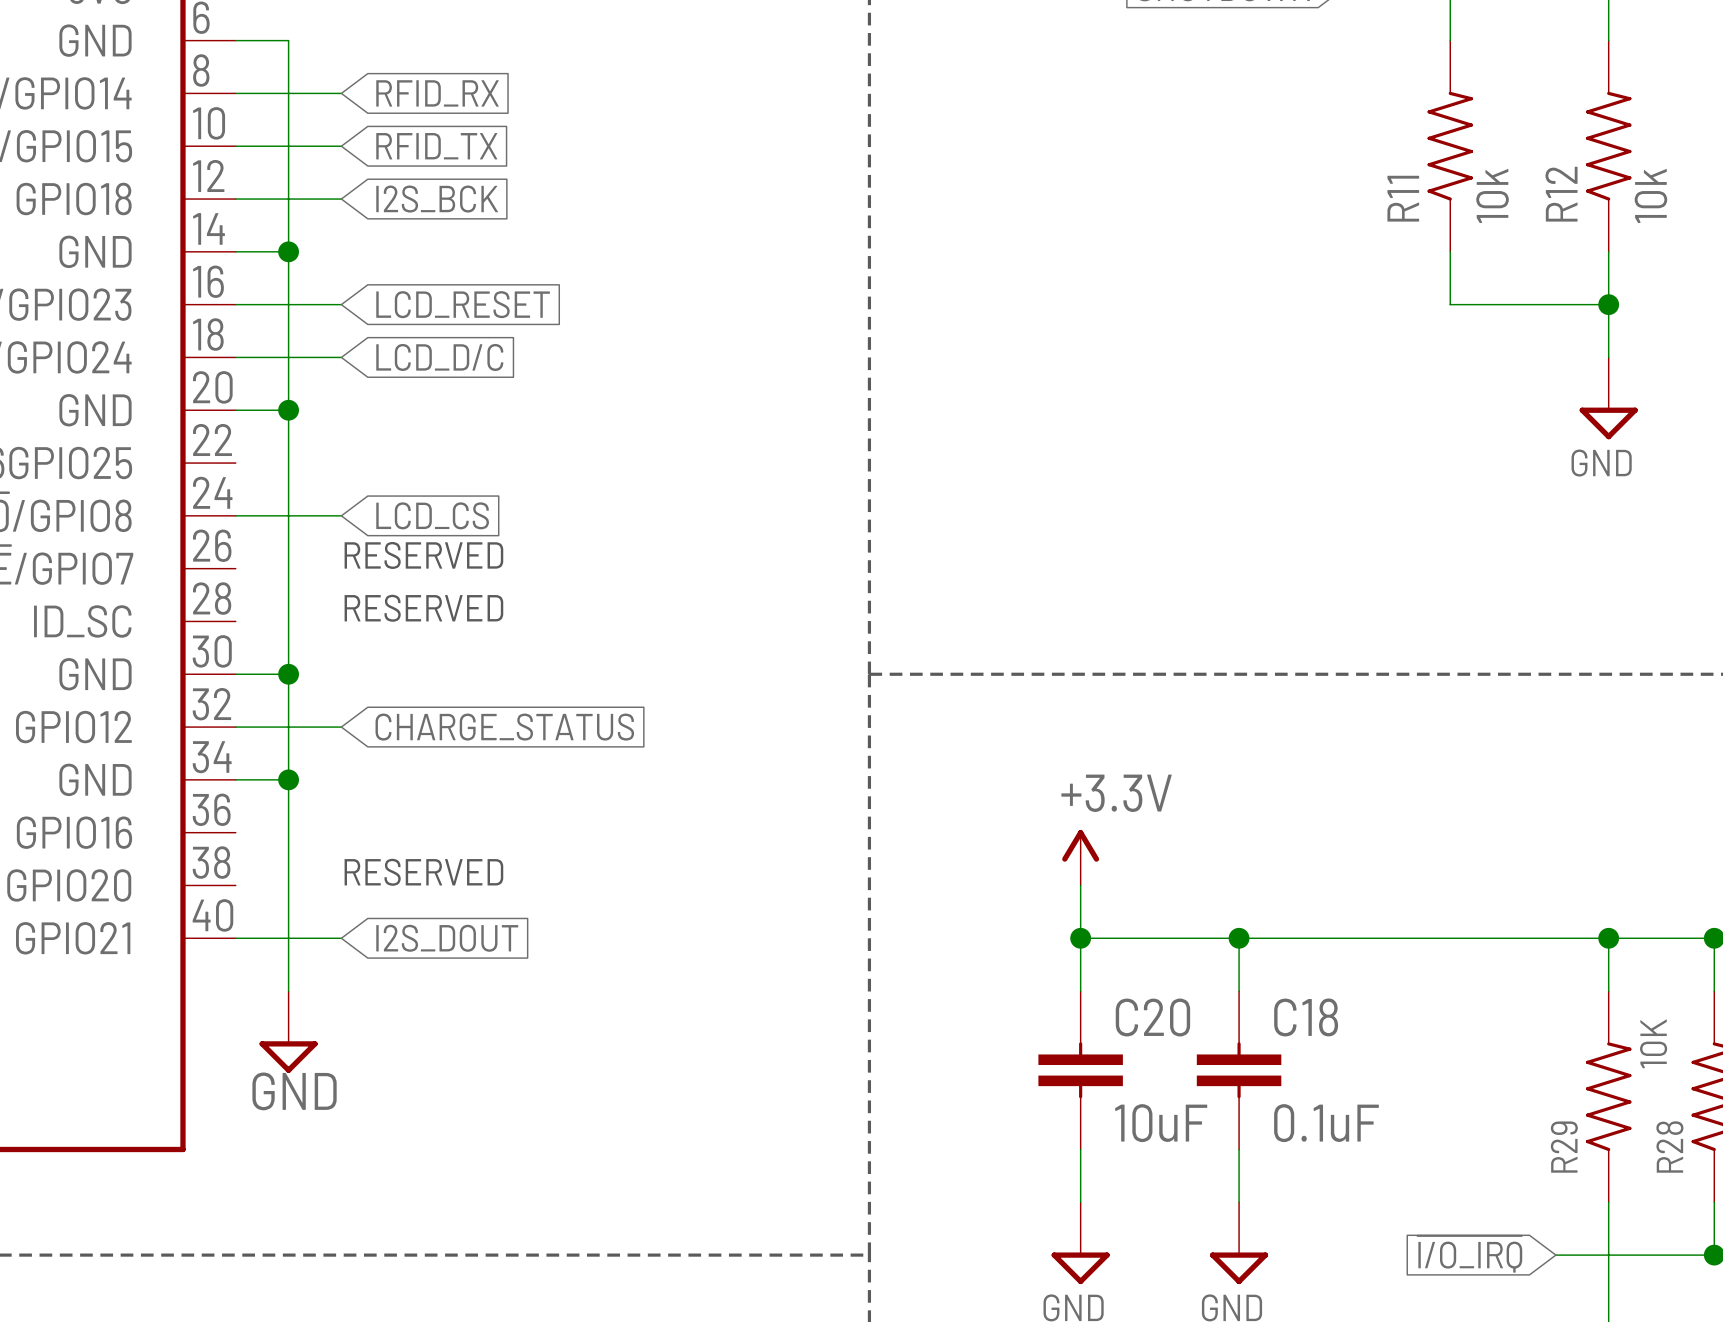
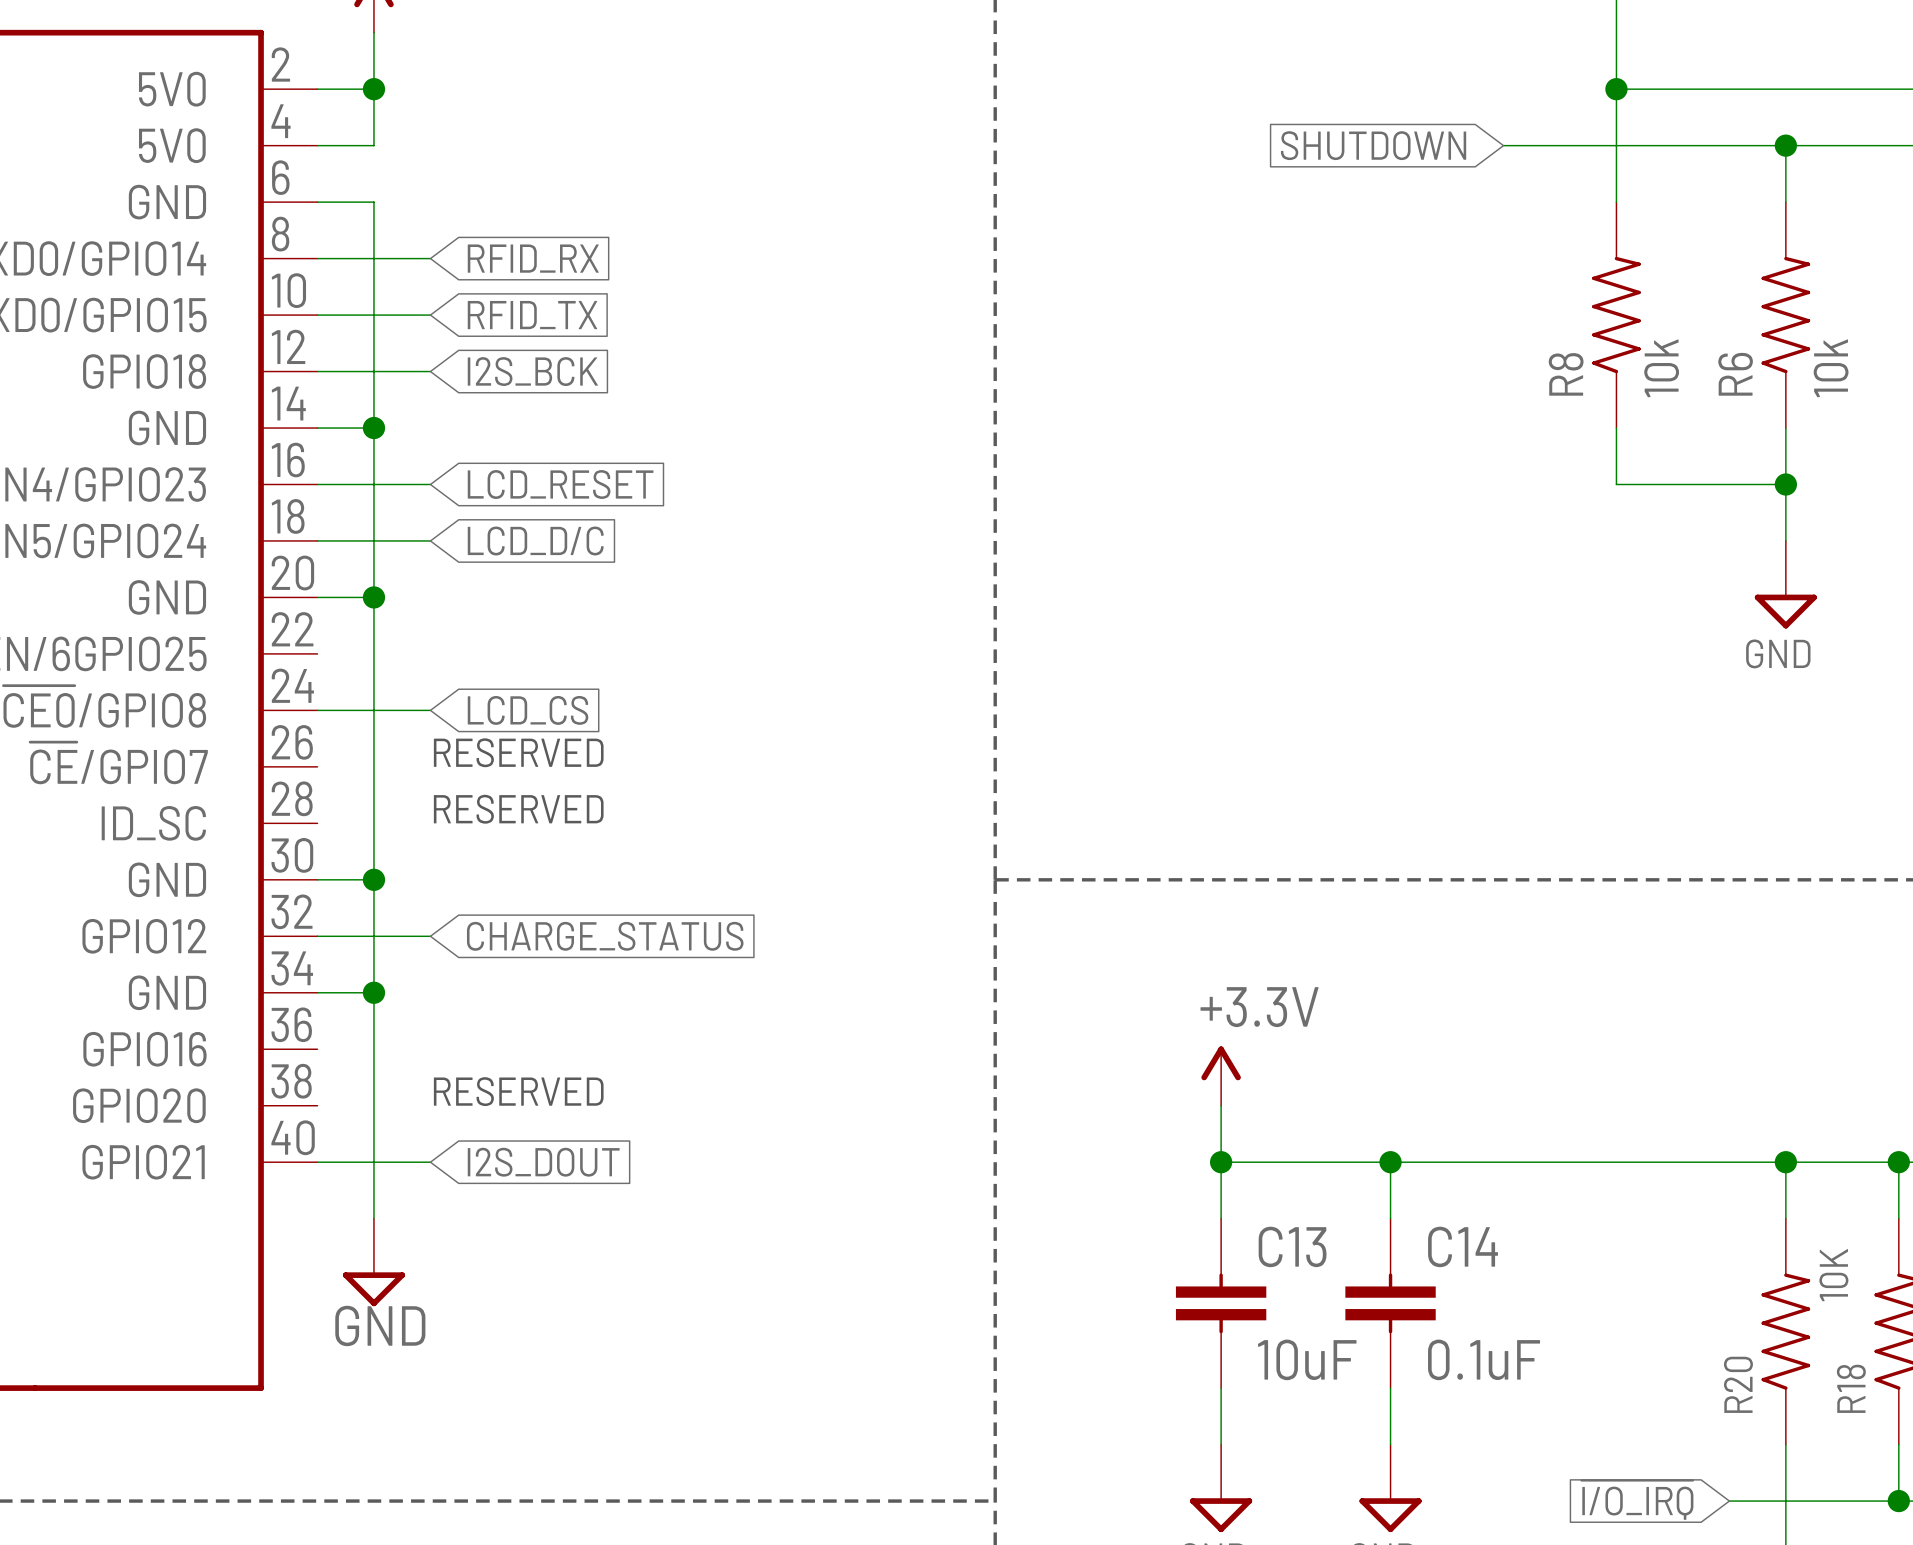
R12 name: R12 (1561, 194) -> R6 (1735, 374)
R11 name: R11 (1403, 198) -> R8 (1566, 374)
C20 name: C20 (1152, 1017) -> C13 (1292, 1246)
C18 name: C18 (1306, 1017) -> C14 (1463, 1246)
R29 name: R29 (1564, 1147) -> R20 (1738, 1384)
R28 name: R28 (1669, 1147) -> R18 (1851, 1388)

